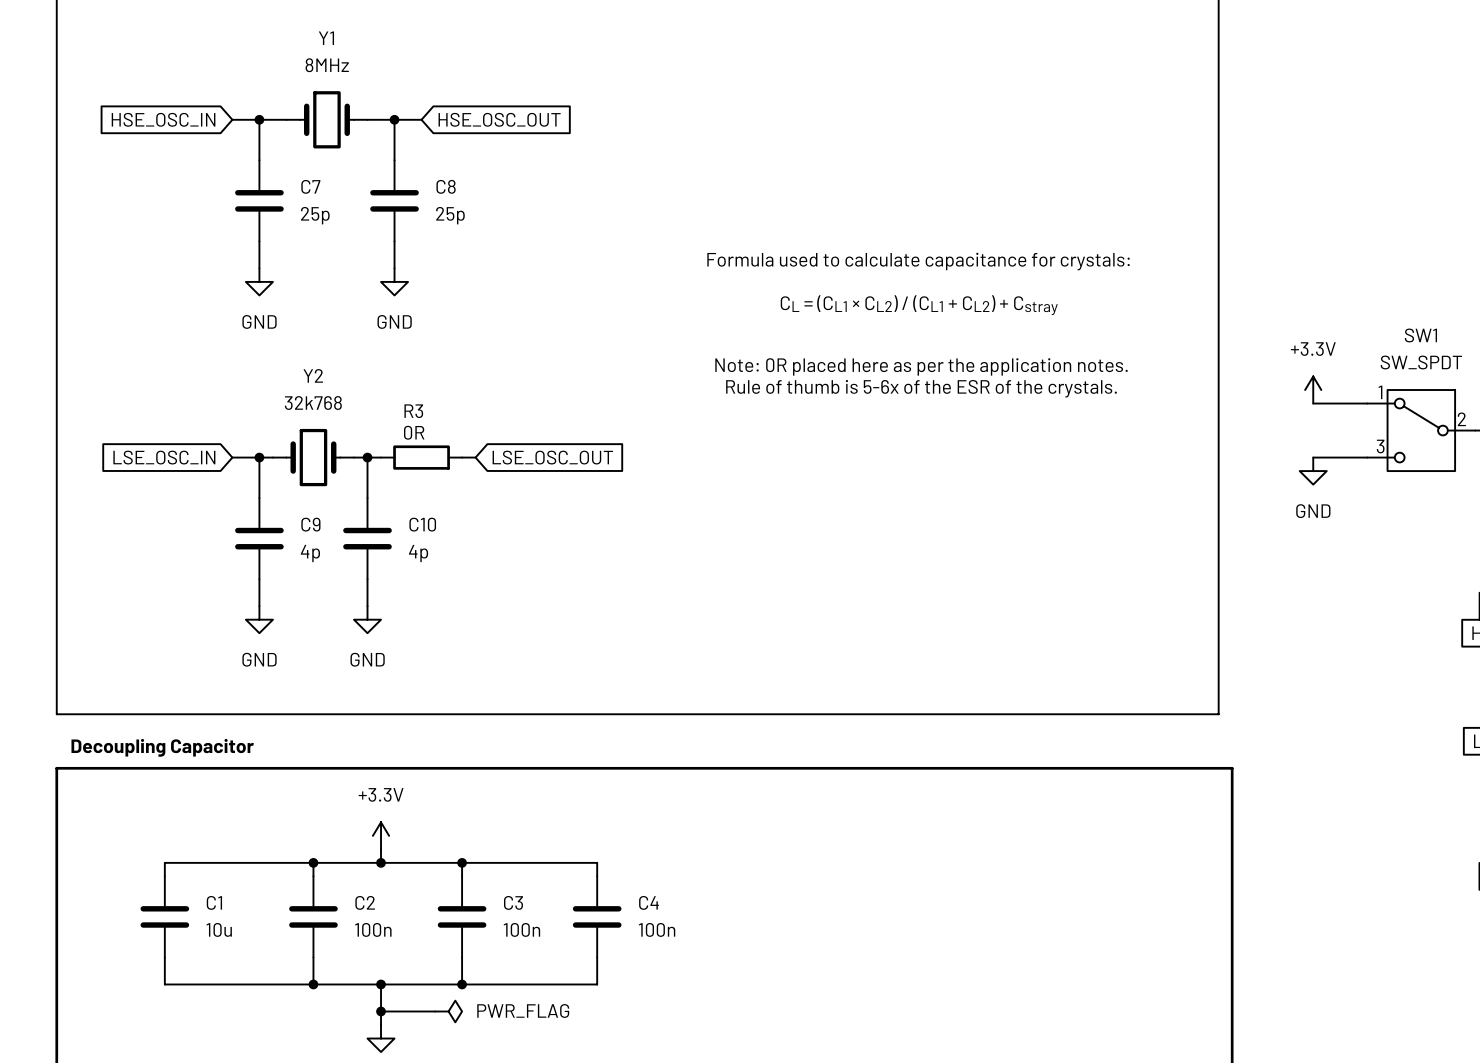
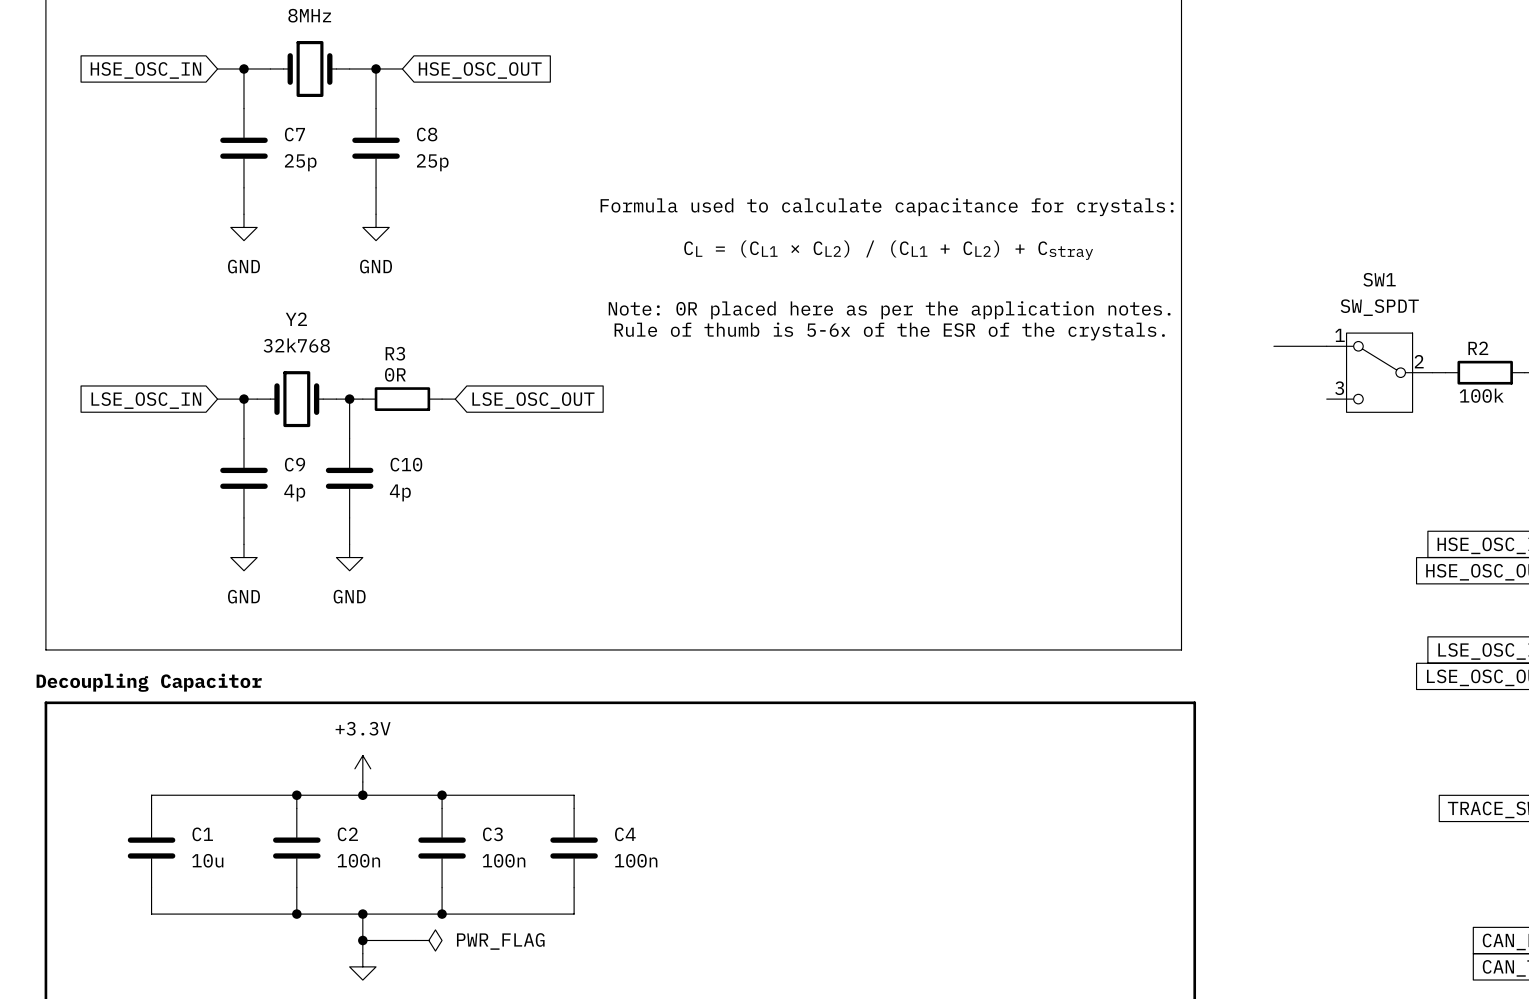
power symbol: +3.3V (1313, 390) -> none
wire: (1313, 457) (1367, 457) -> none
power symbol: GND (1313, 471) -> none

